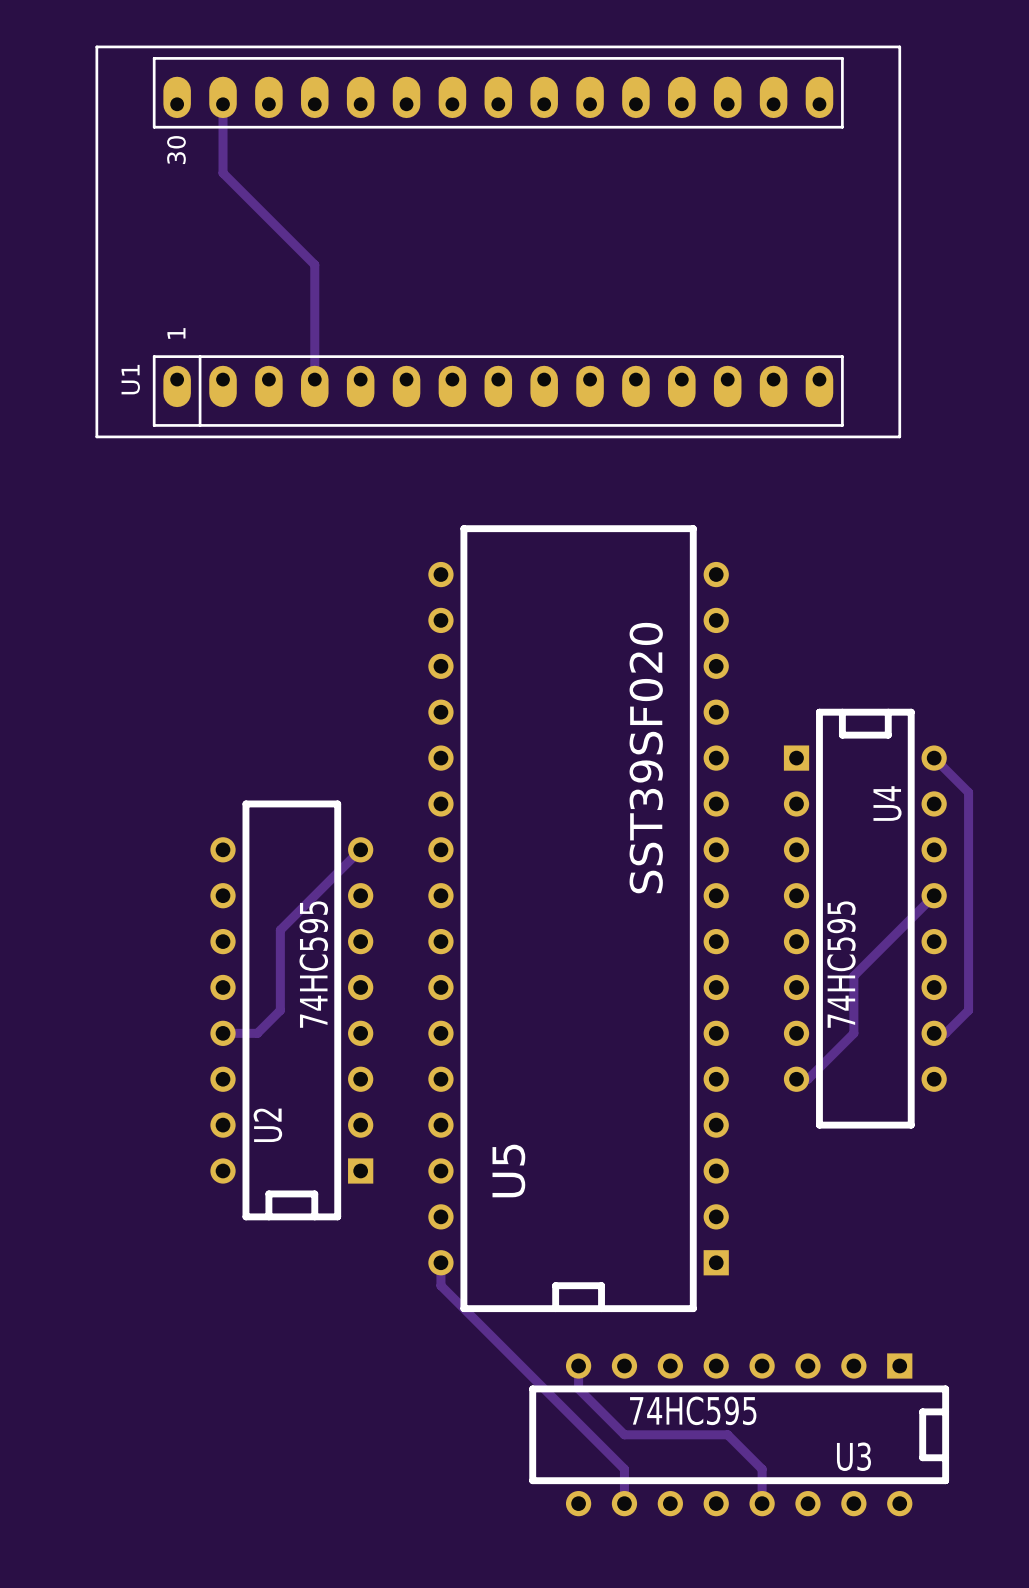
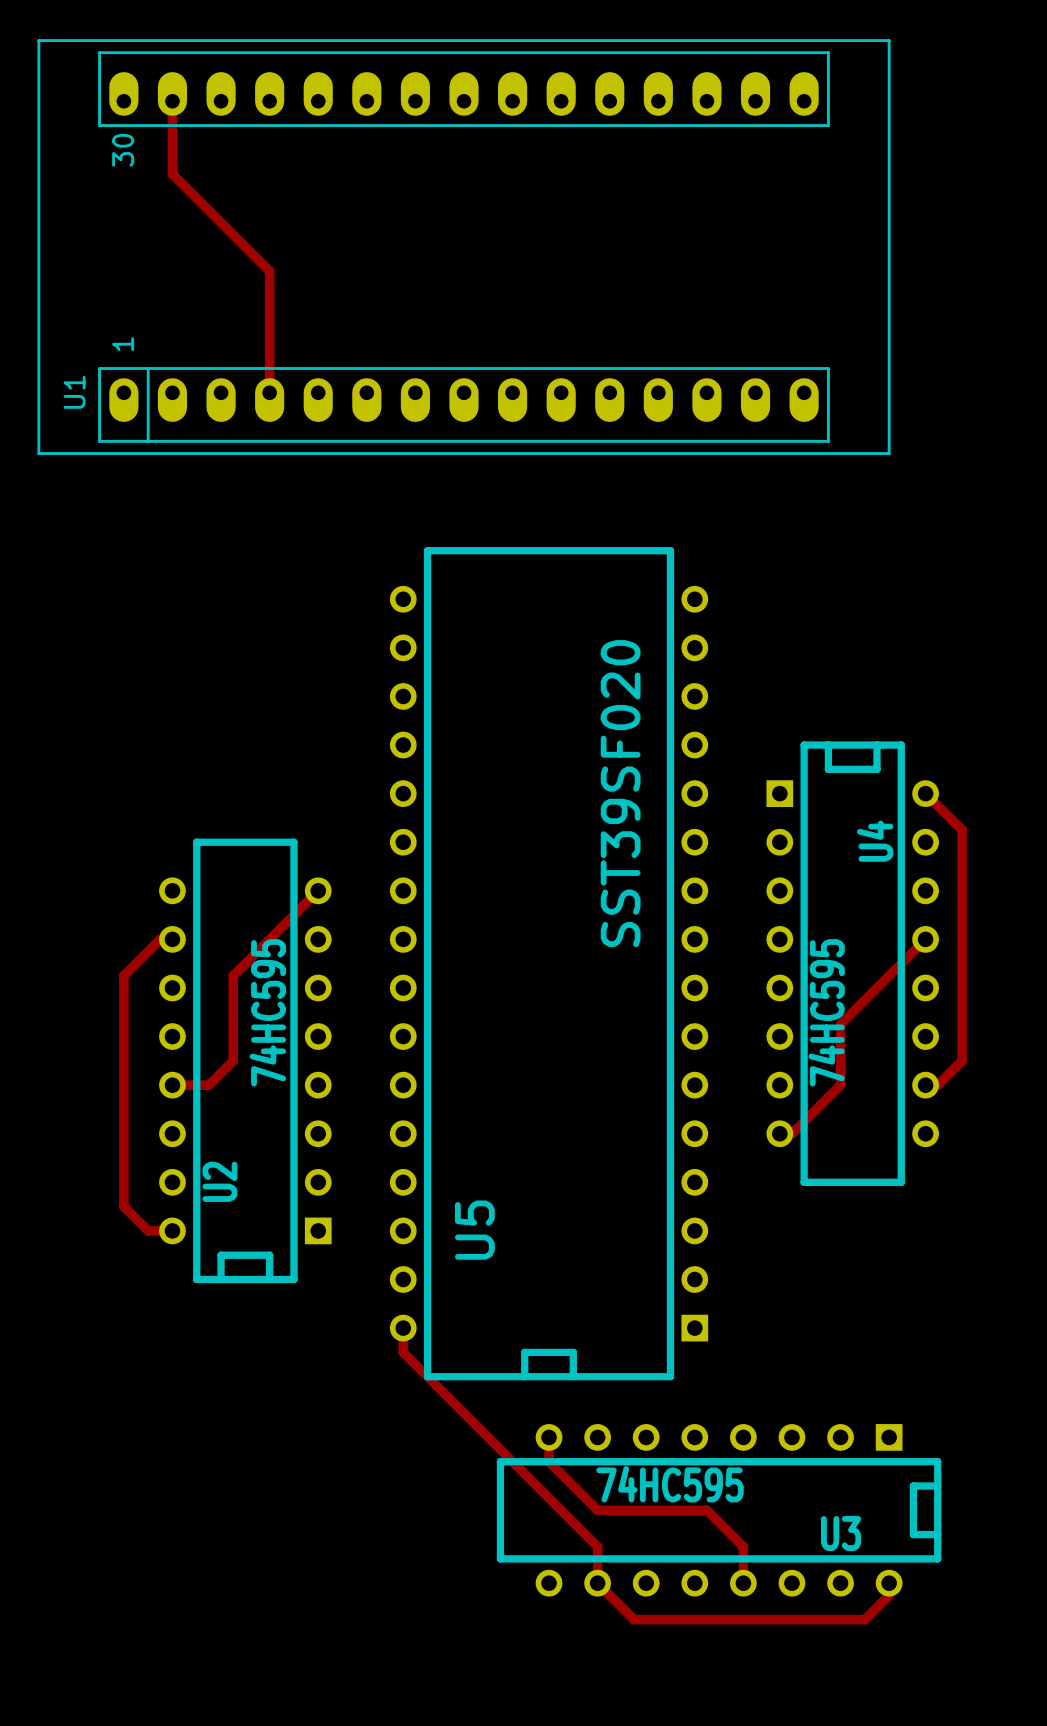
track: none -> (172, 939) (160, 939) (123, 975) (123, 1206) (148, 1230) (172, 1230)
track: none -> (597, 1583) (634, 1619) (864, 1619) (889, 1595) (889, 1583)

